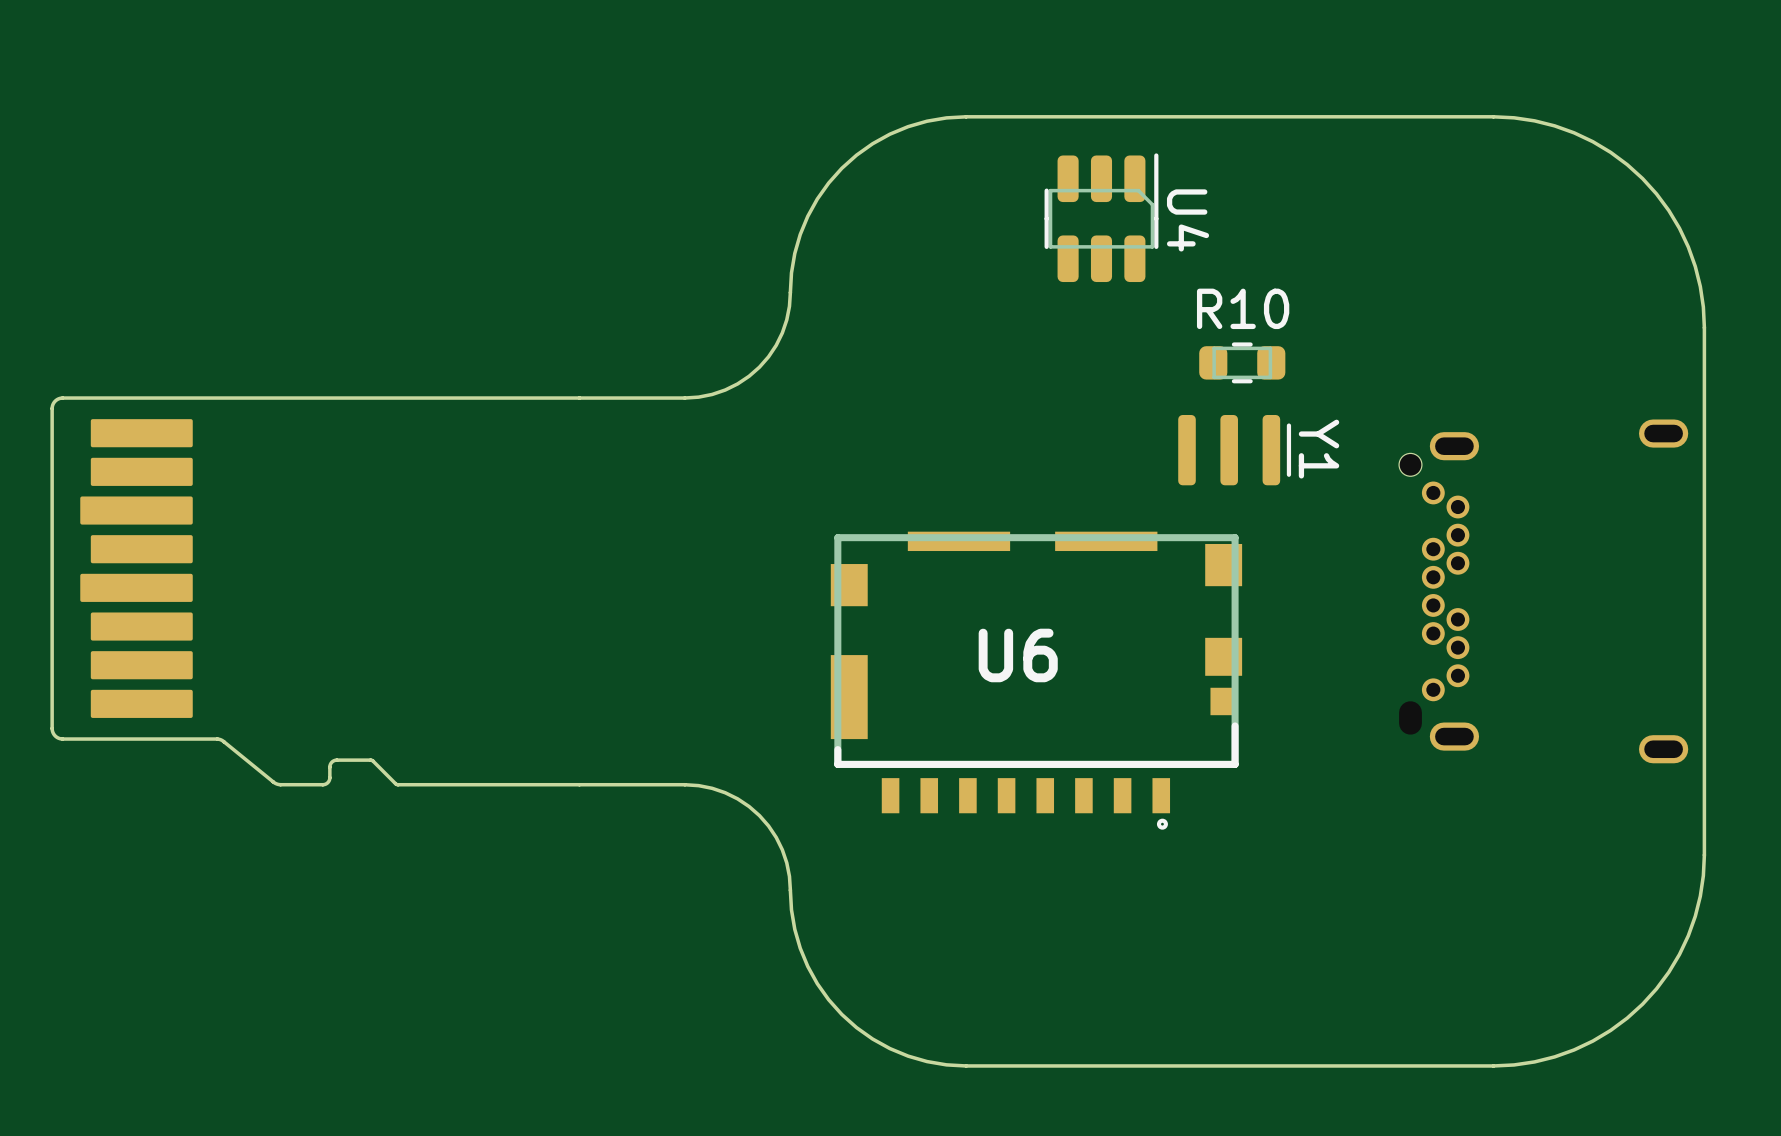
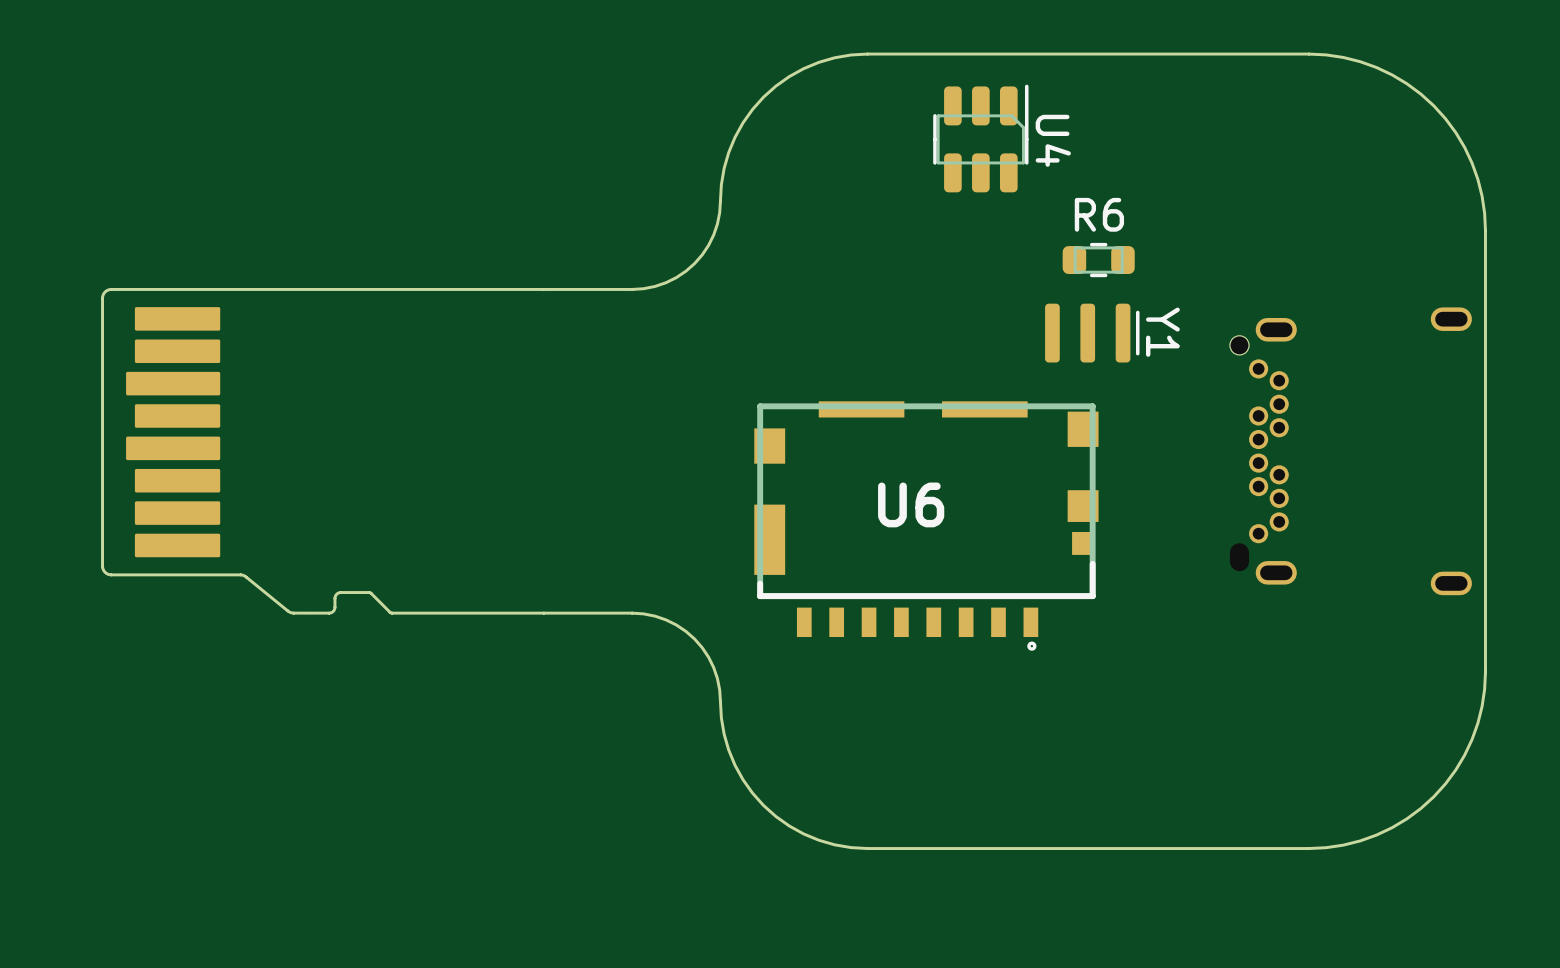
R10 name: R10 (1243, 308) -> R6 (1099, 214)

